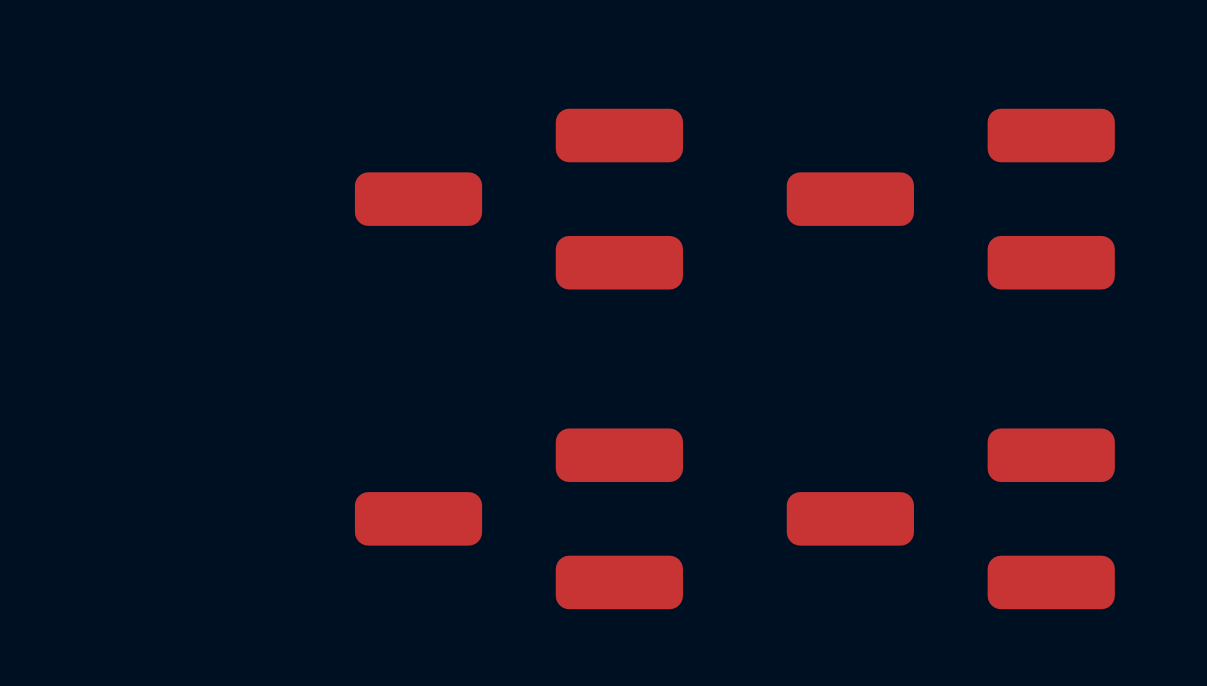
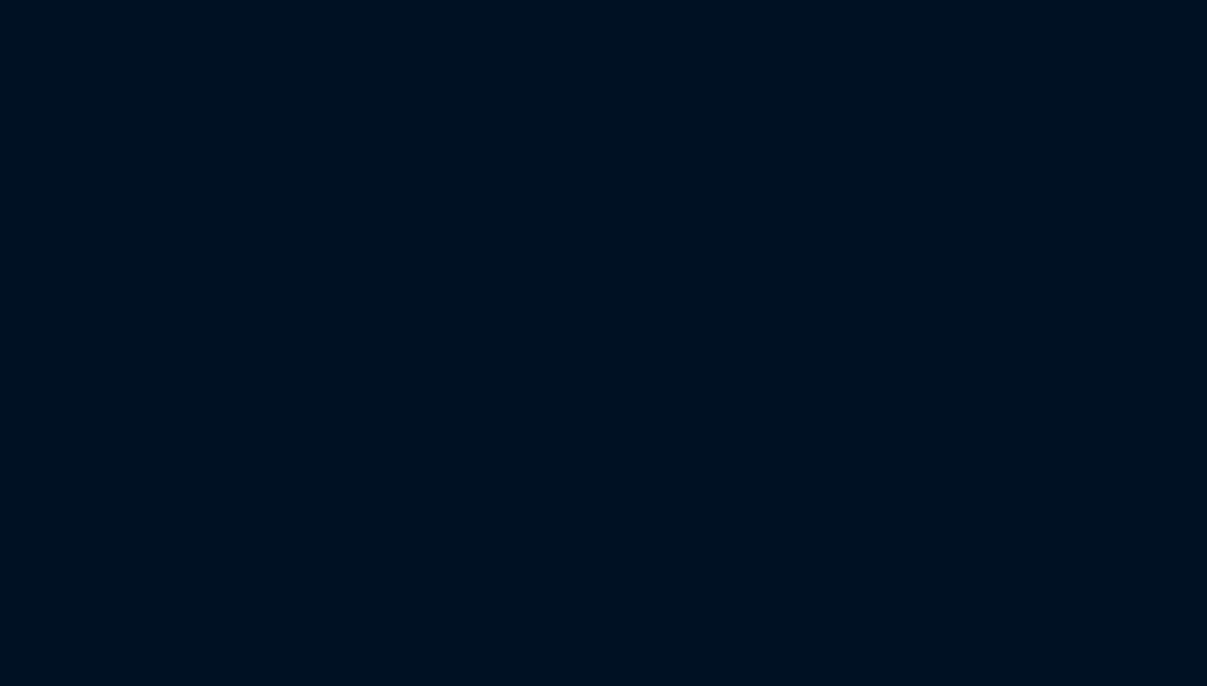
part: (518, 199) -> none
part: (950, 199) -> none
part: (518, 518) -> none
part: (950, 518) -> none

